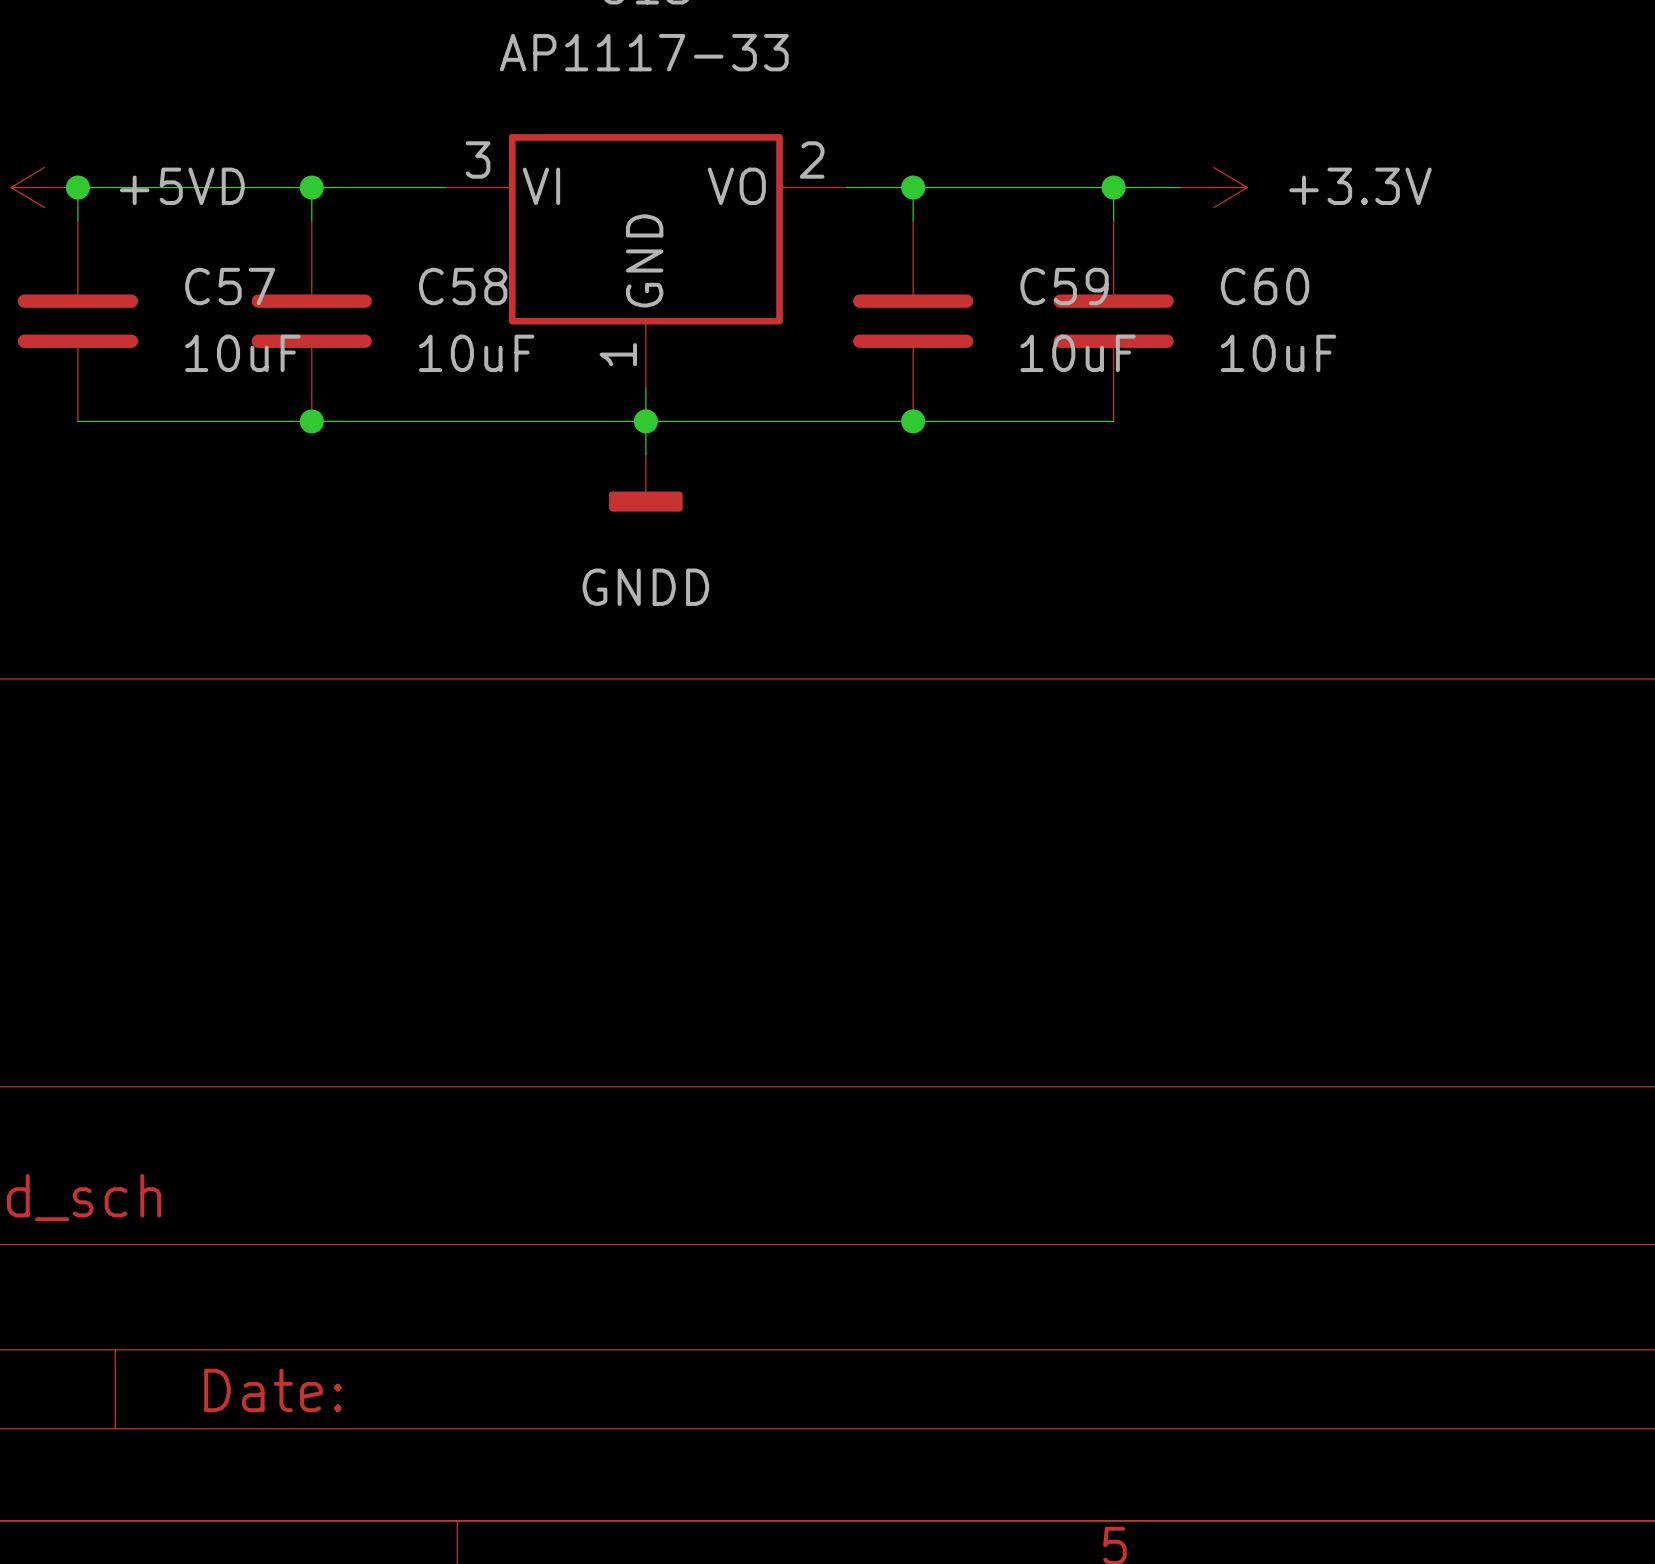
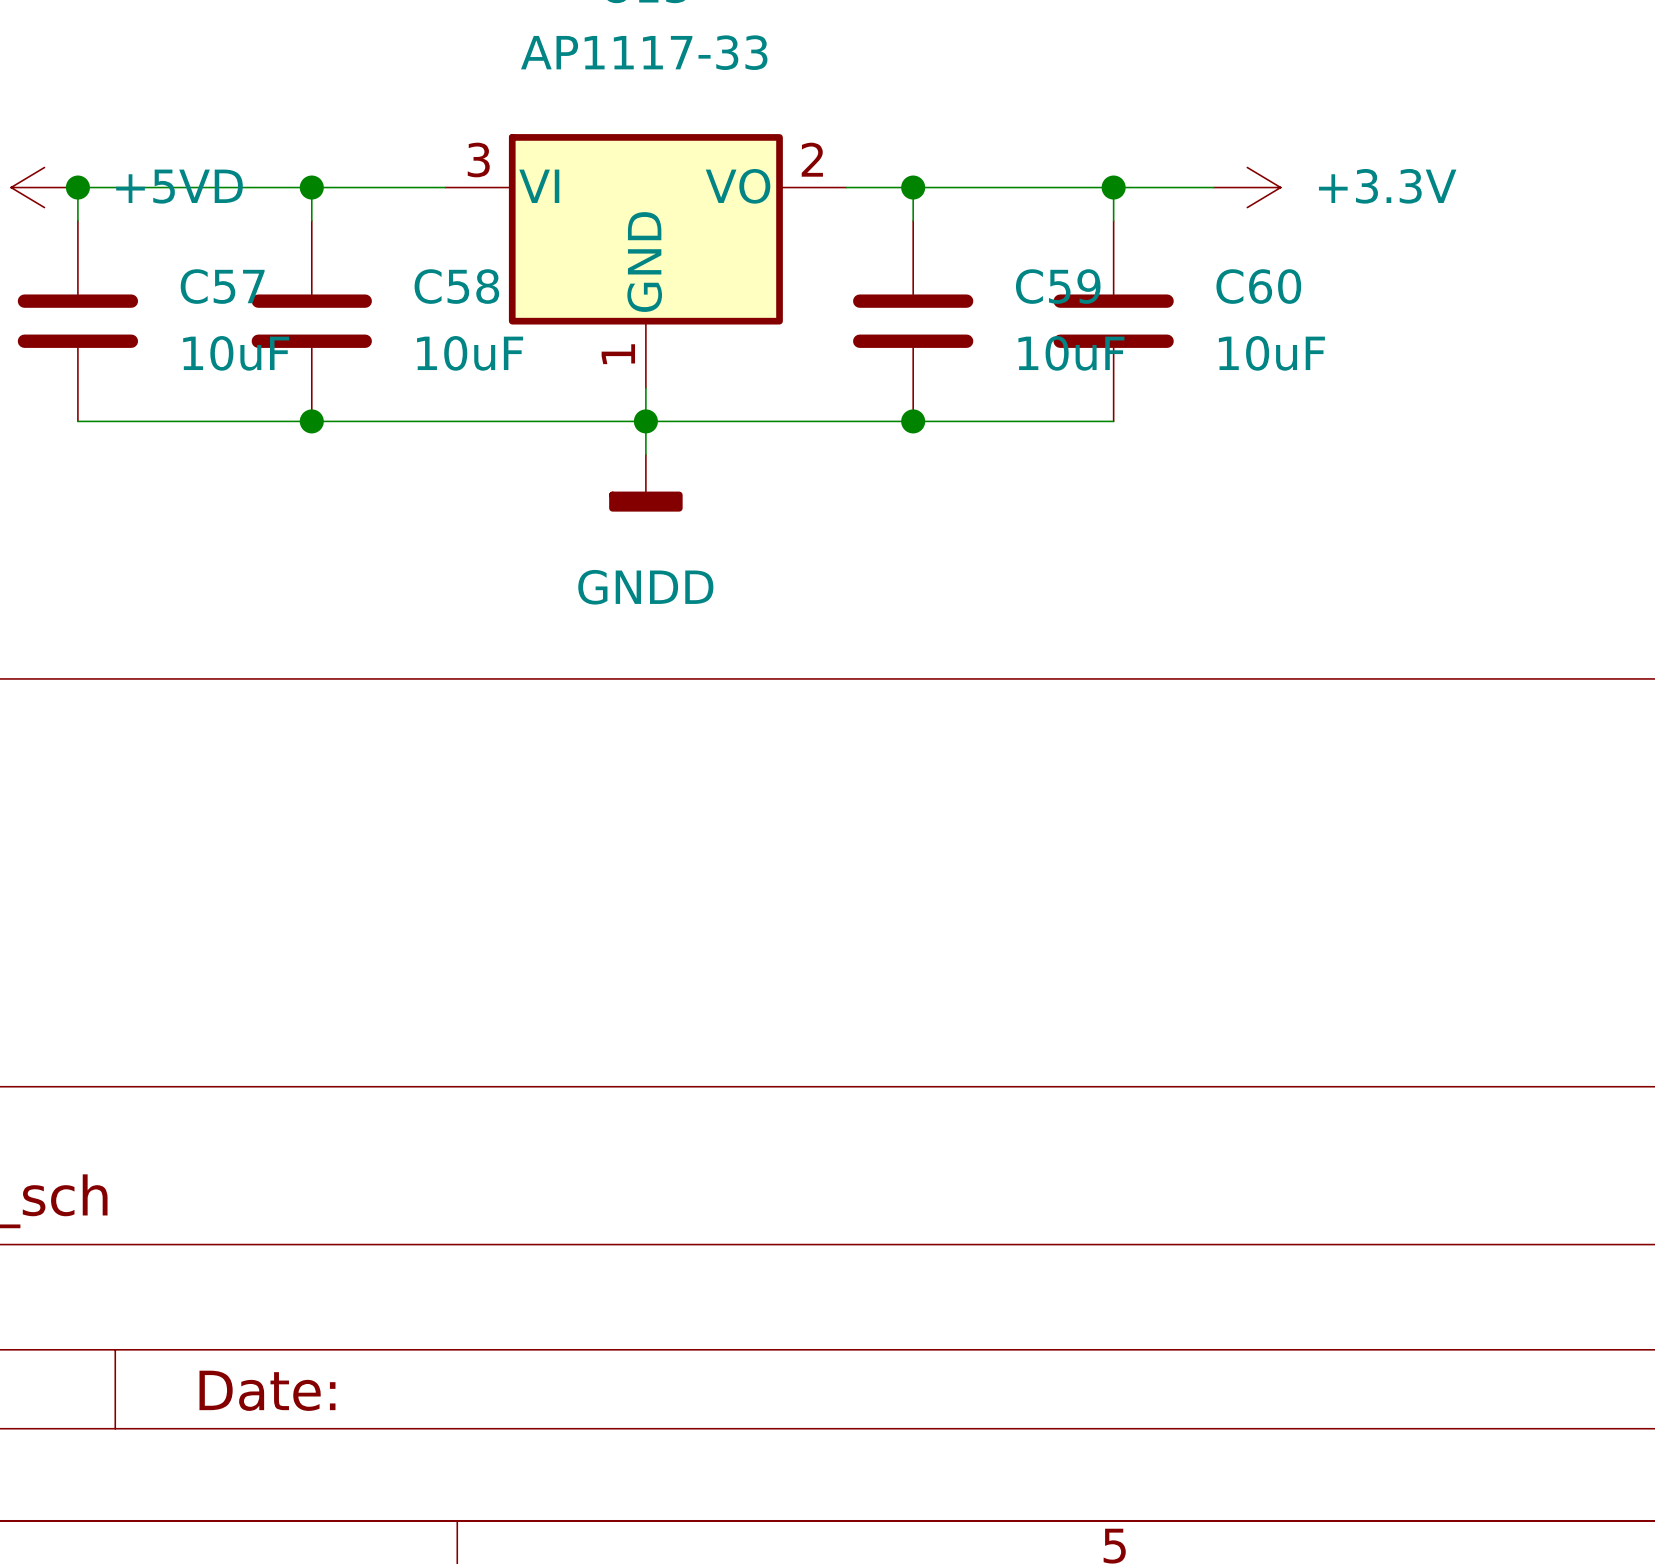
power symbol position: +3.3V (1213, 187) -> +3.3V (1247, 187)

